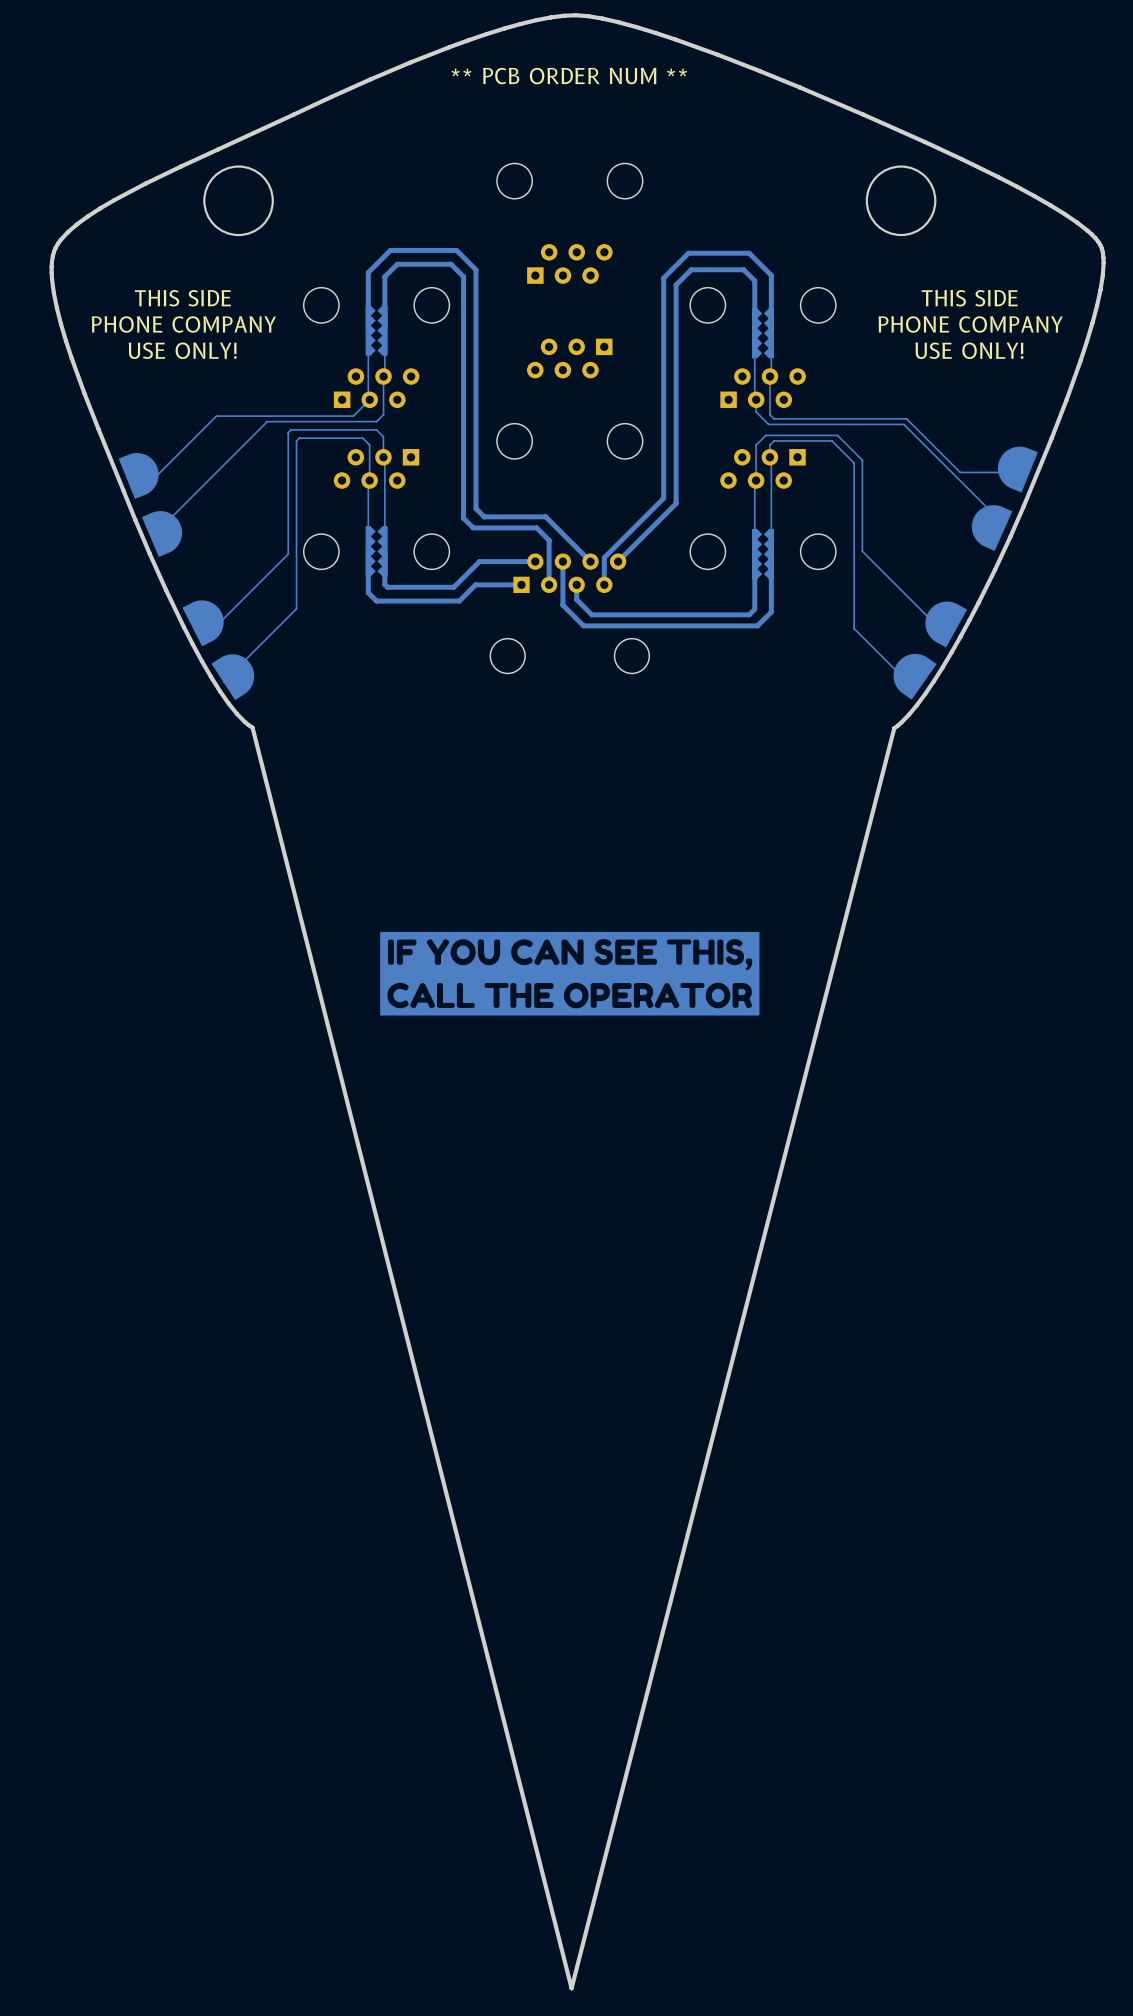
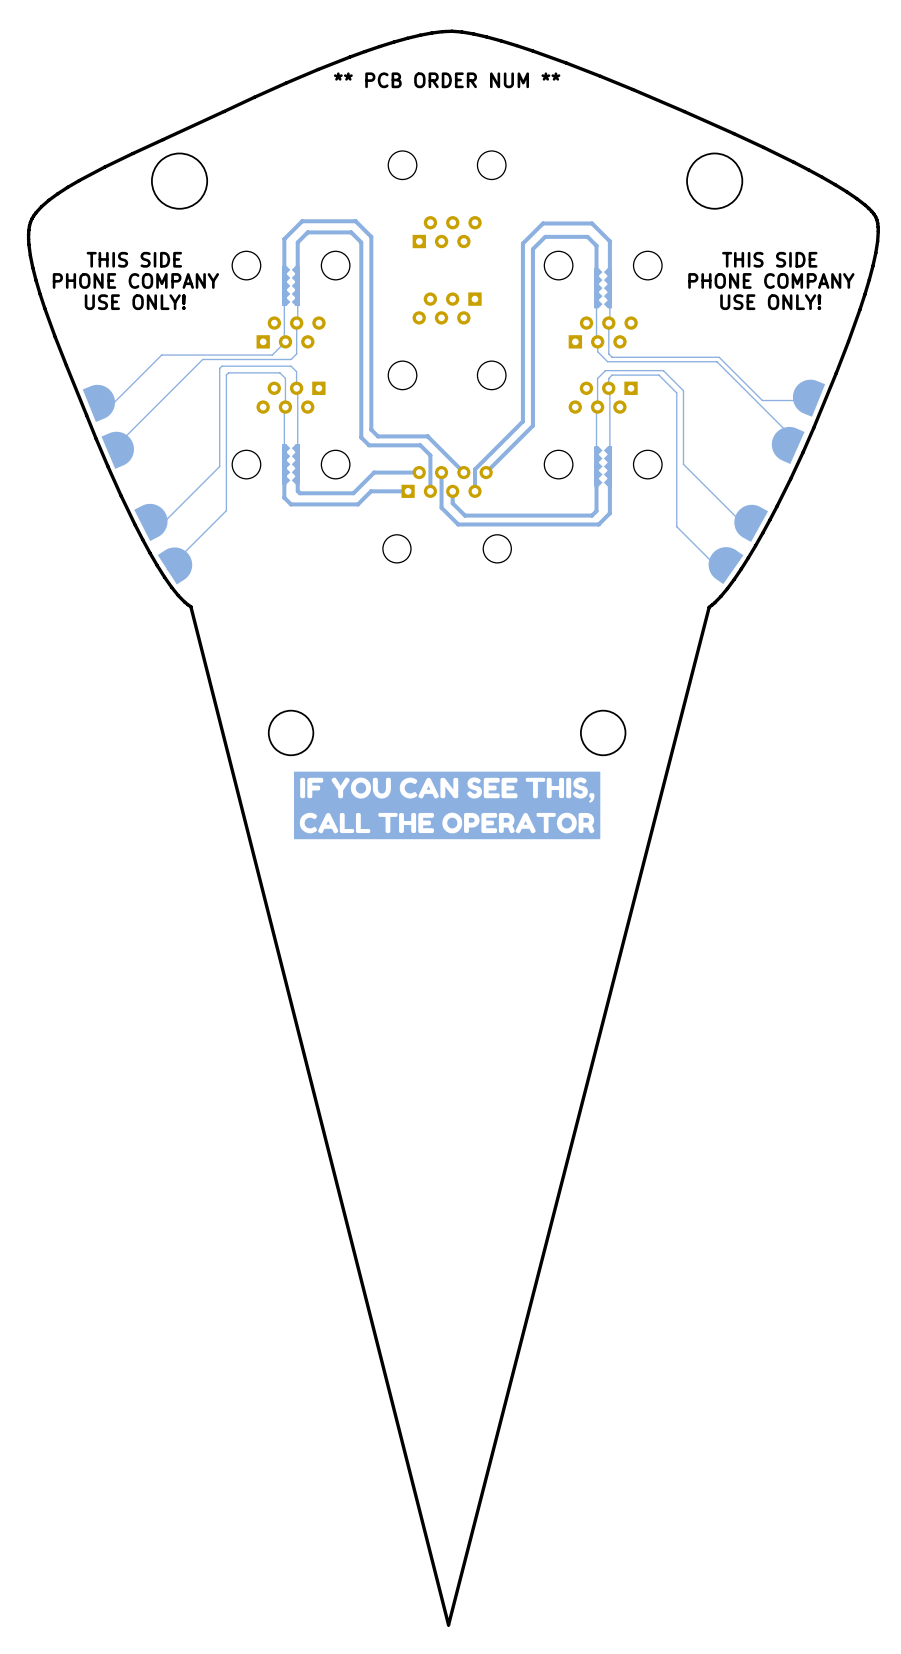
round board edge: none -> [267, 709, 315, 757]
round board edge: none -> [580, 709, 627, 757]

